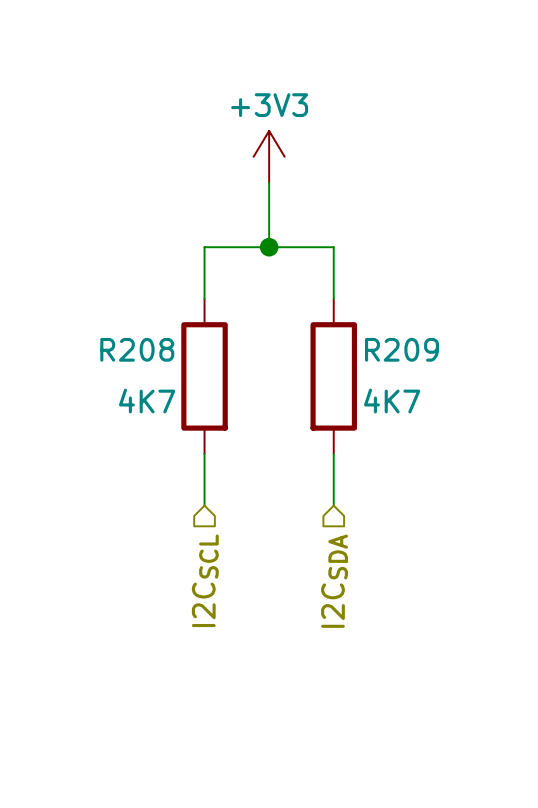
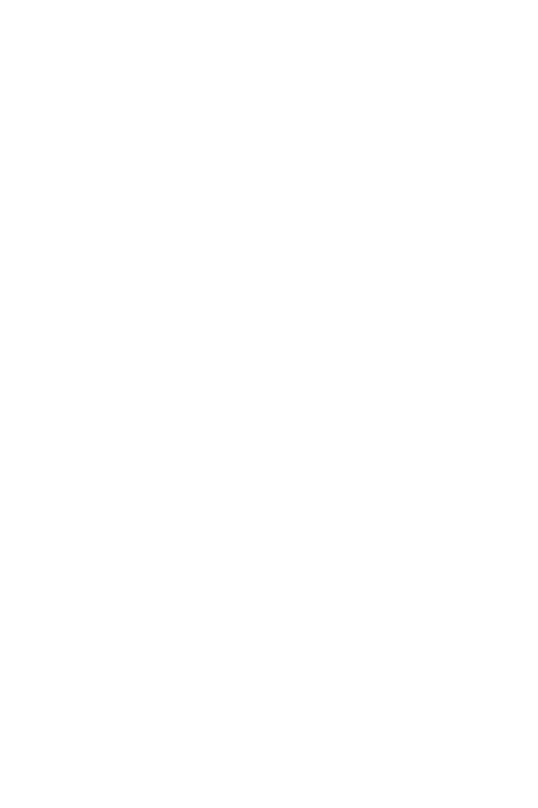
power symbol: +3V3 (269, 156) -> none
wire: (269, 182) (269, 247) -> none
junction: (269, 247) -> none
wire: (204, 298) (204, 247) (333, 247) (333, 298) -> none
R208: 4K7 (204, 376) -> none
R209: 4K7 (333, 376) -> none
wire: (204, 453) (204, 505) -> none
wire: (333, 453) (333, 505) -> none
hierarchical label: I2CSCL (205, 580) -> none
hierarchical label: I2CSDA (334, 581) -> none

